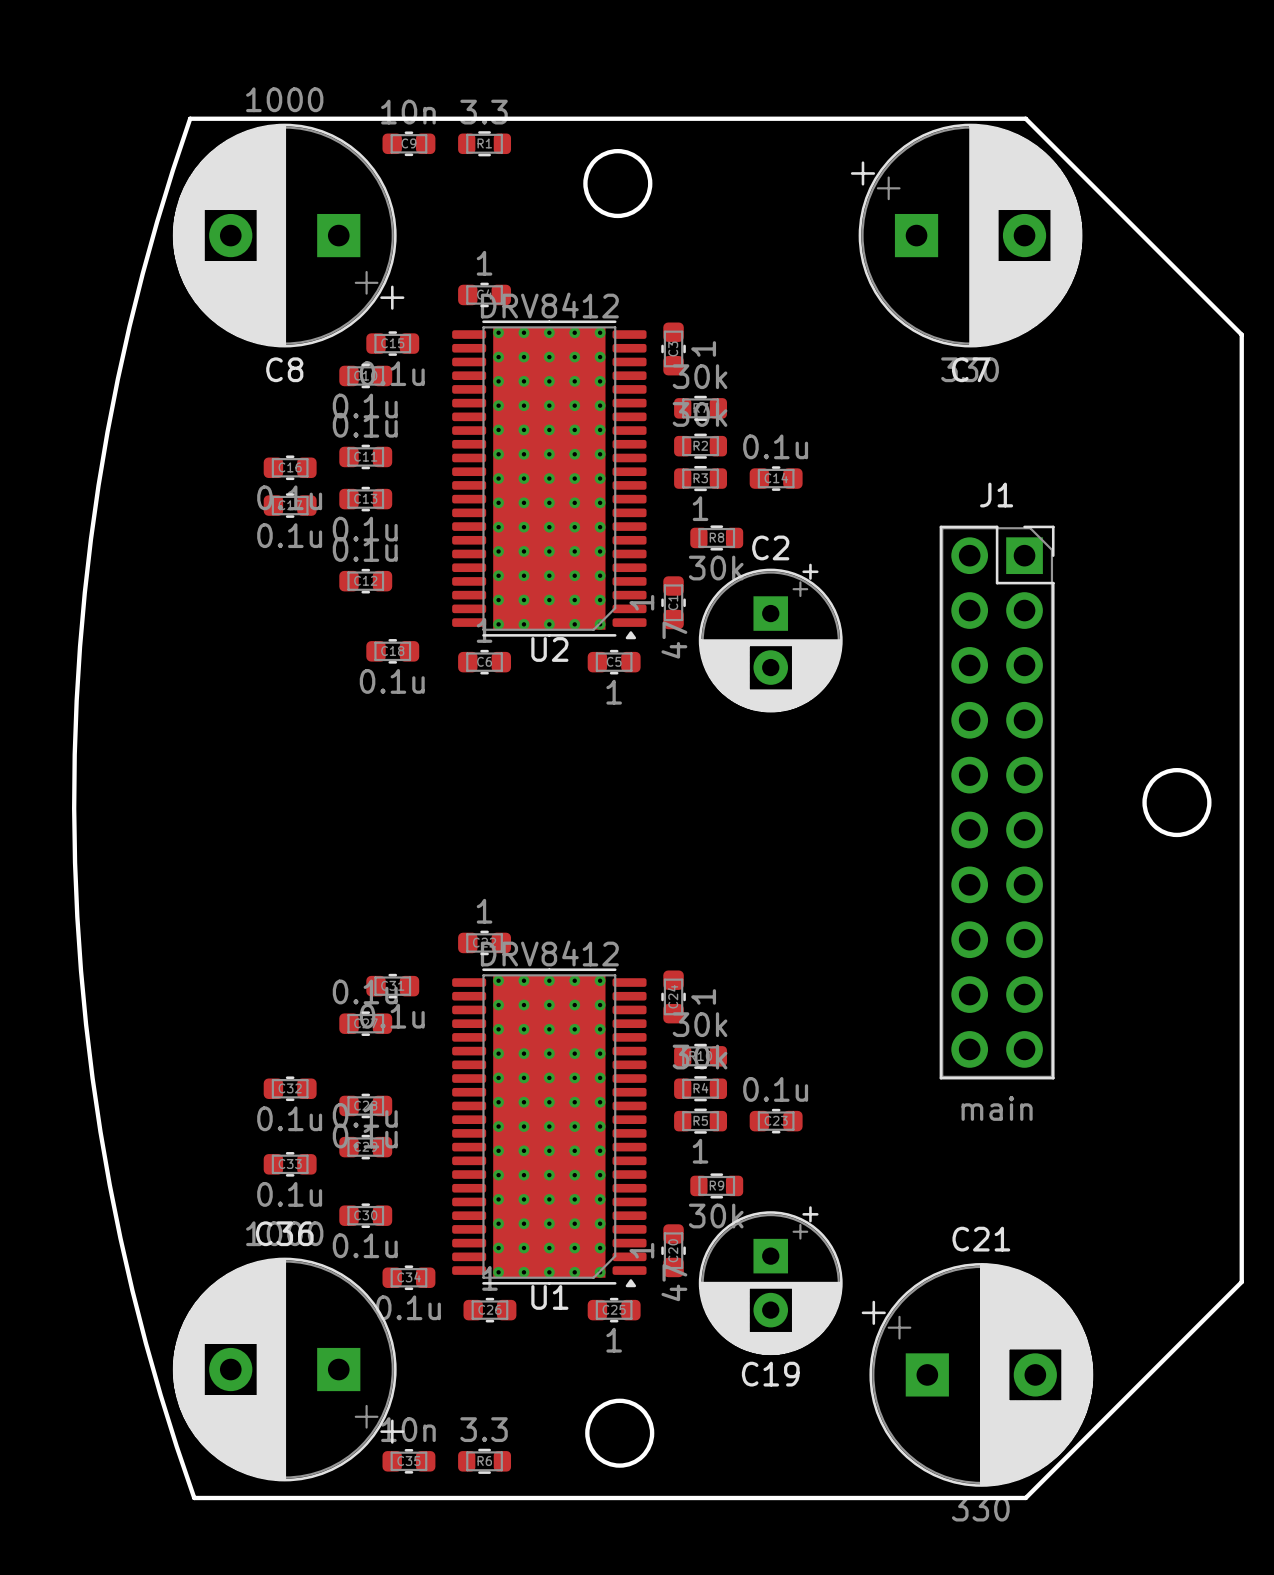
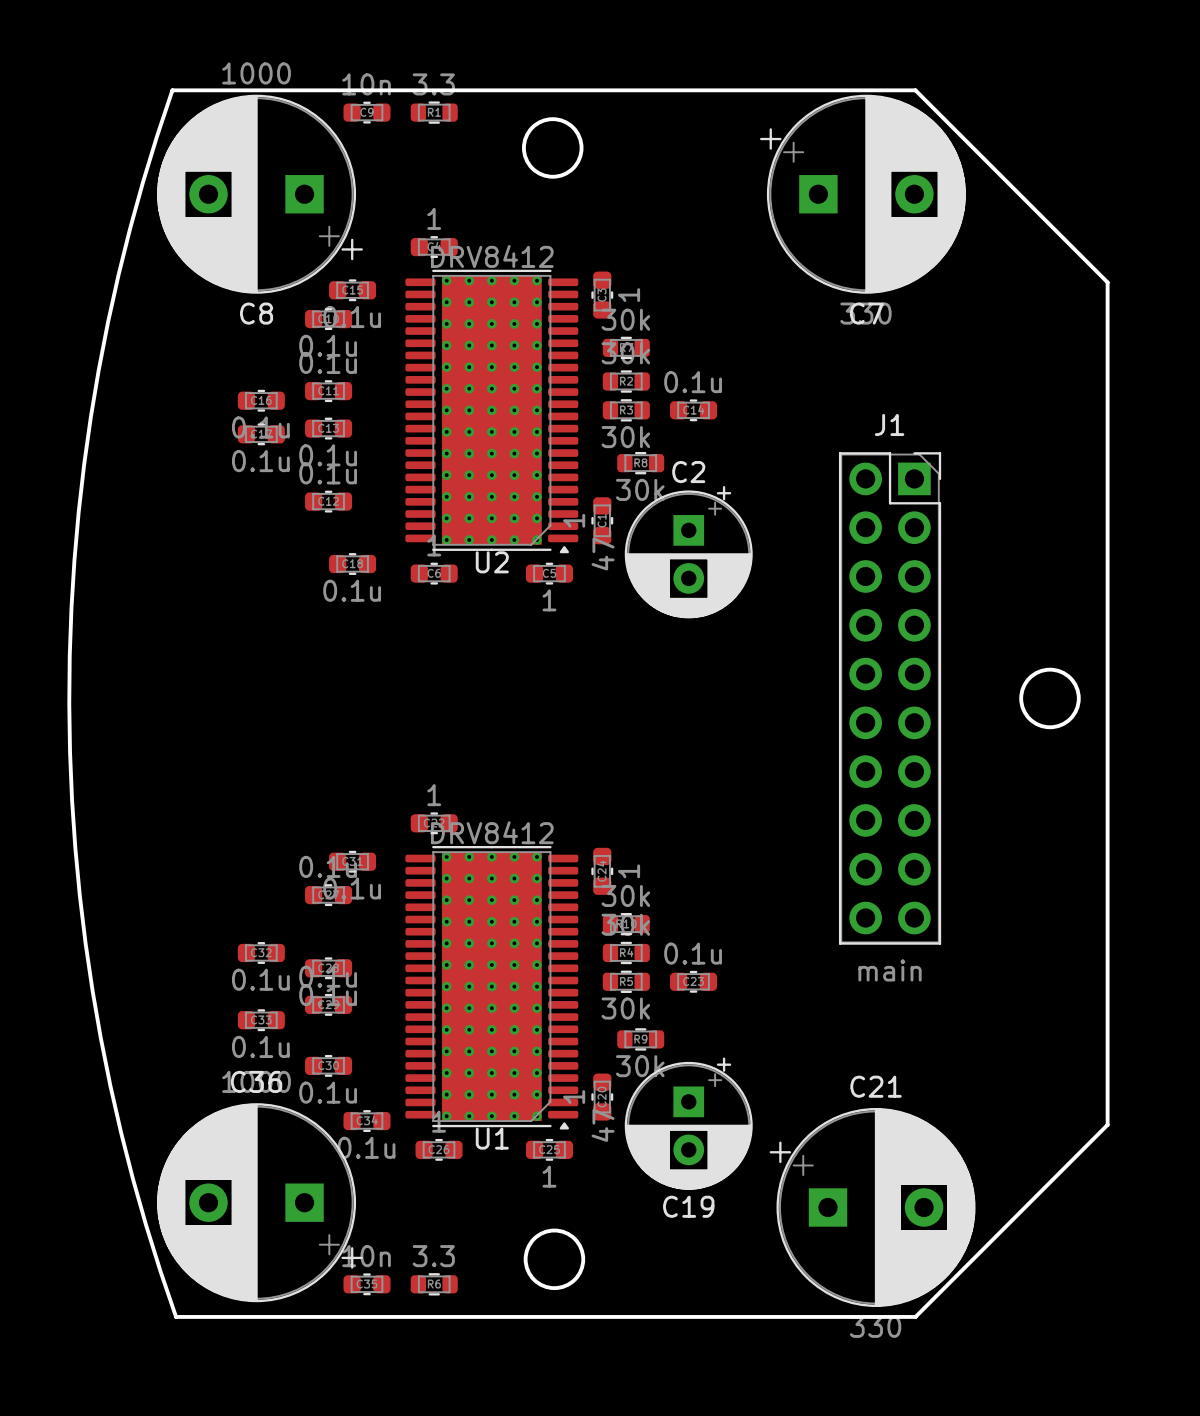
R3 value: 1 (700, 508) -> 30k (625, 437)
R5 value: 1 (700, 1151) -> 30k (625, 1008)

